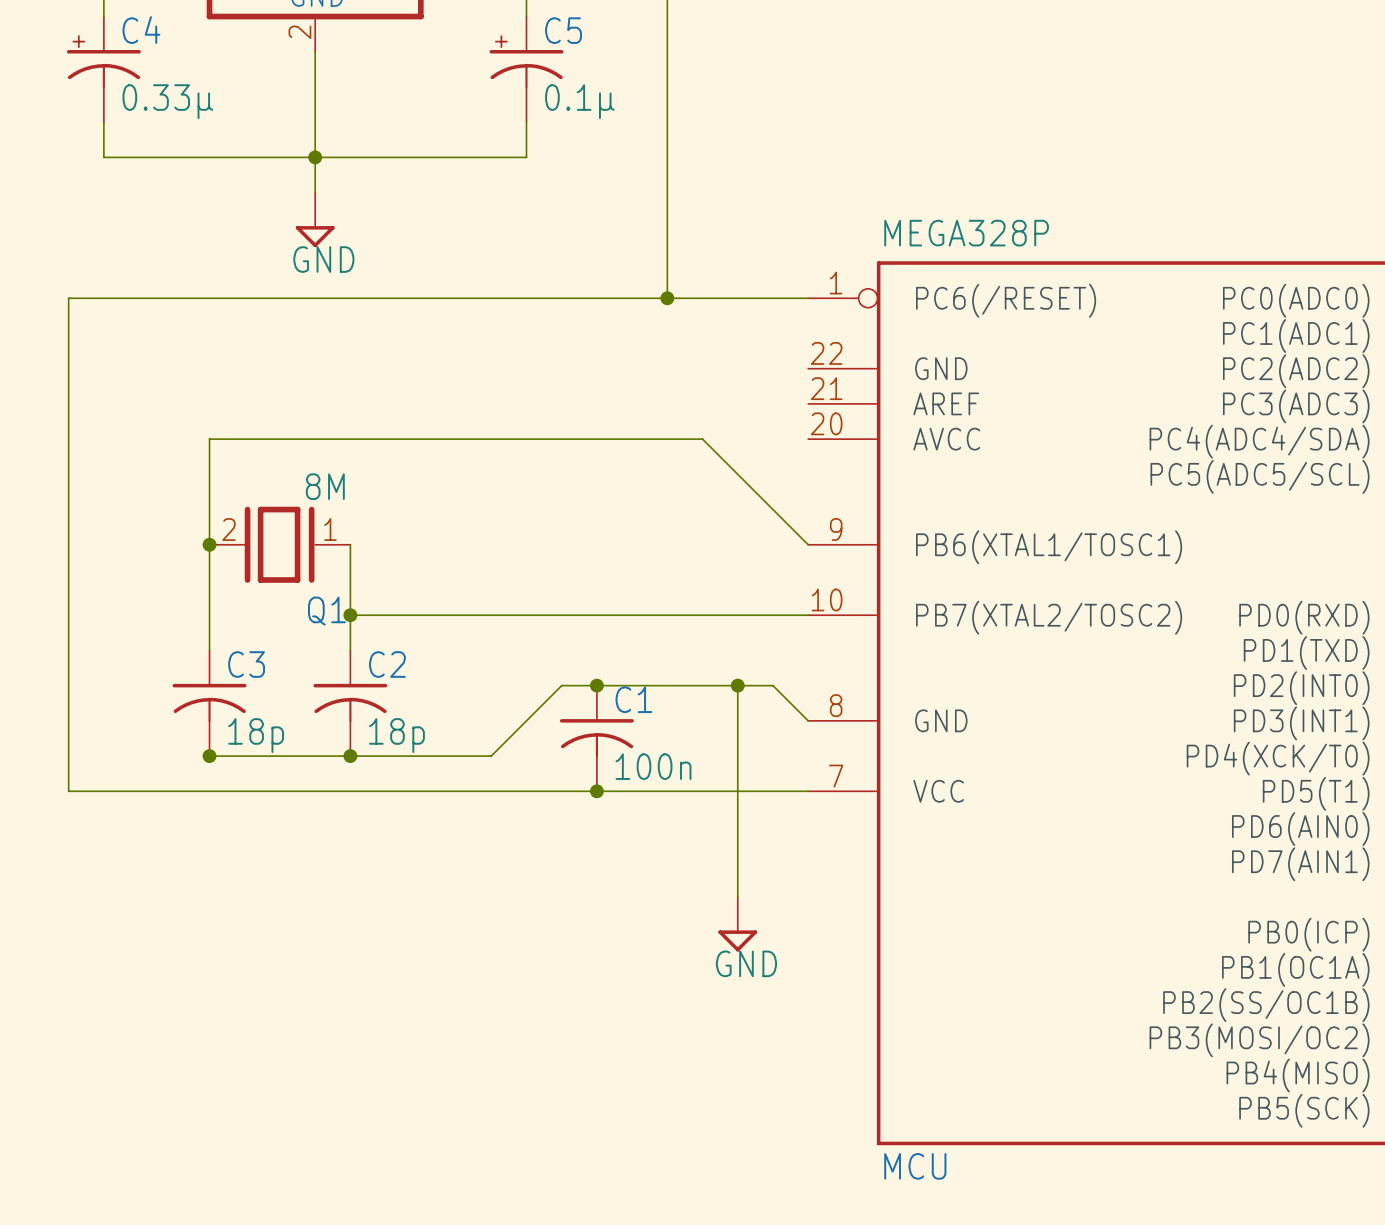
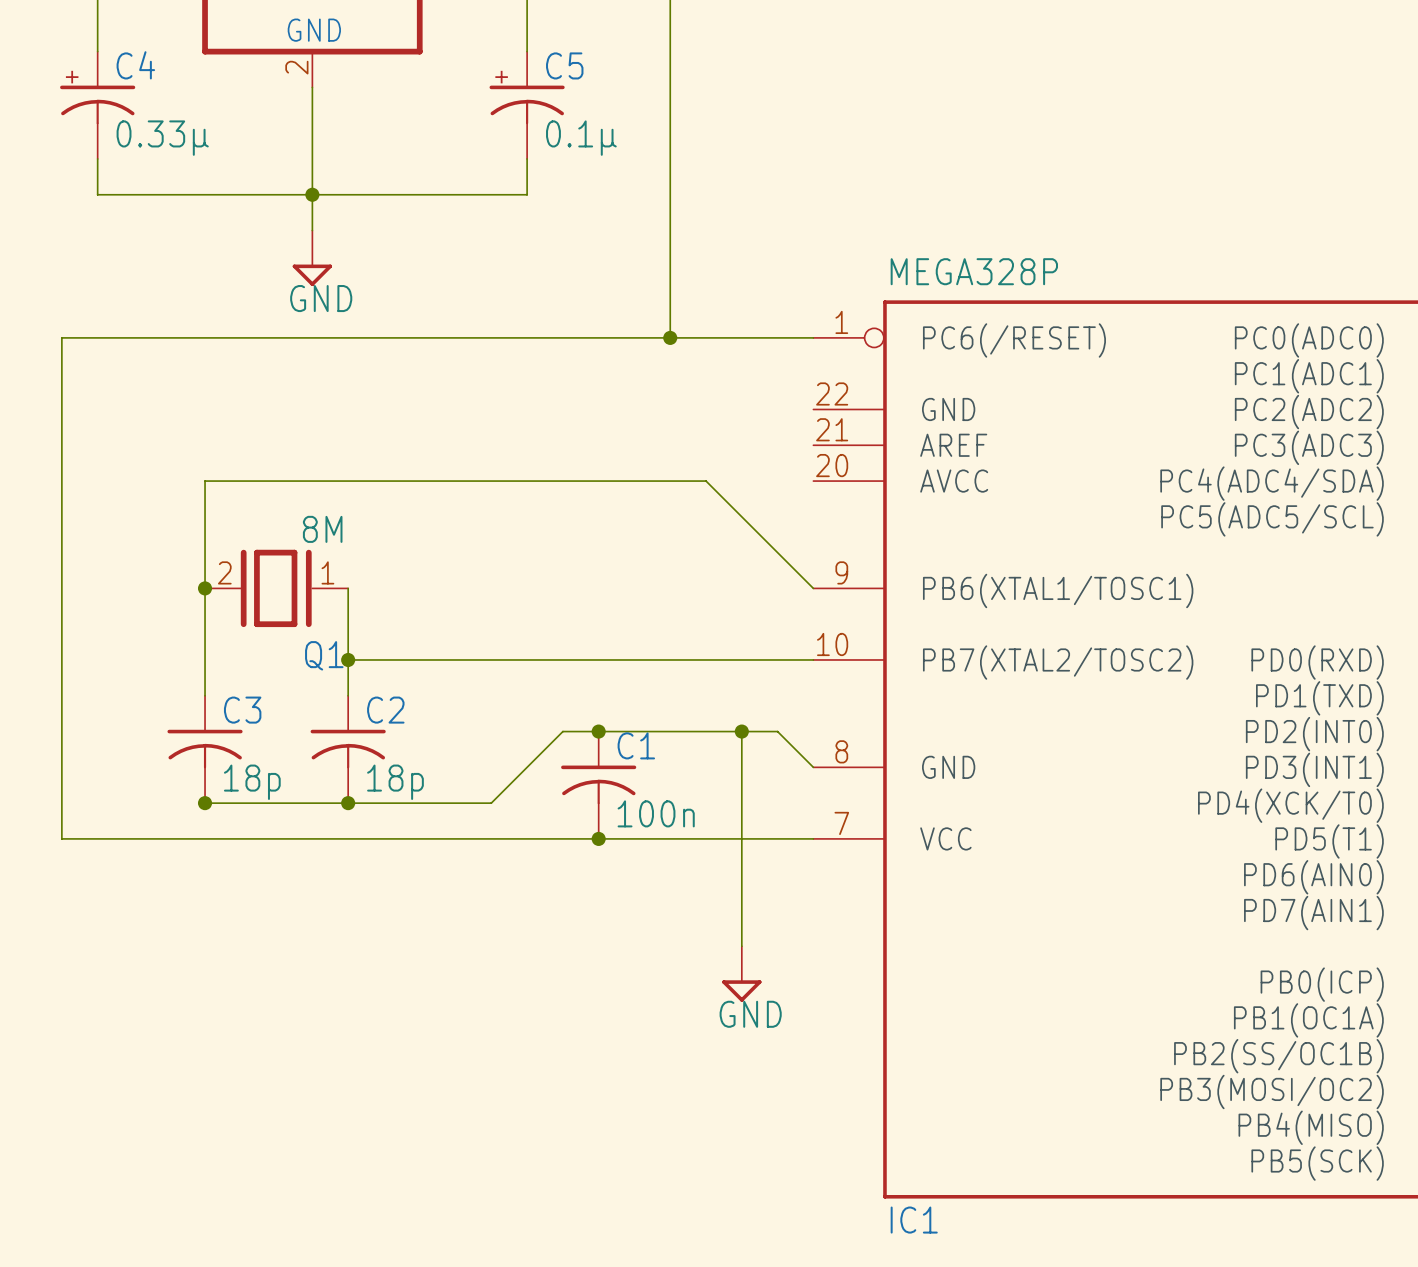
MCU name: MCU (915, 1166) -> IC1 (914, 1220)

